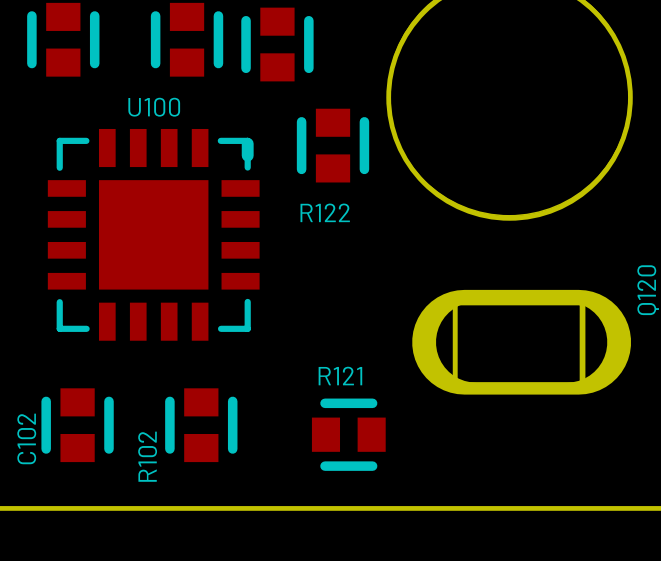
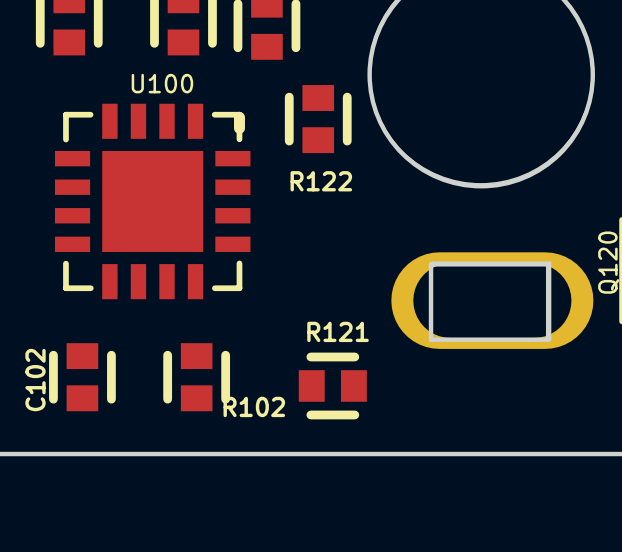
R102 name rotation: 0° (147, 456) -> 90° clockwise (254, 406)
R102 name position: R102 (147, 456) -> R102 (254, 406)

